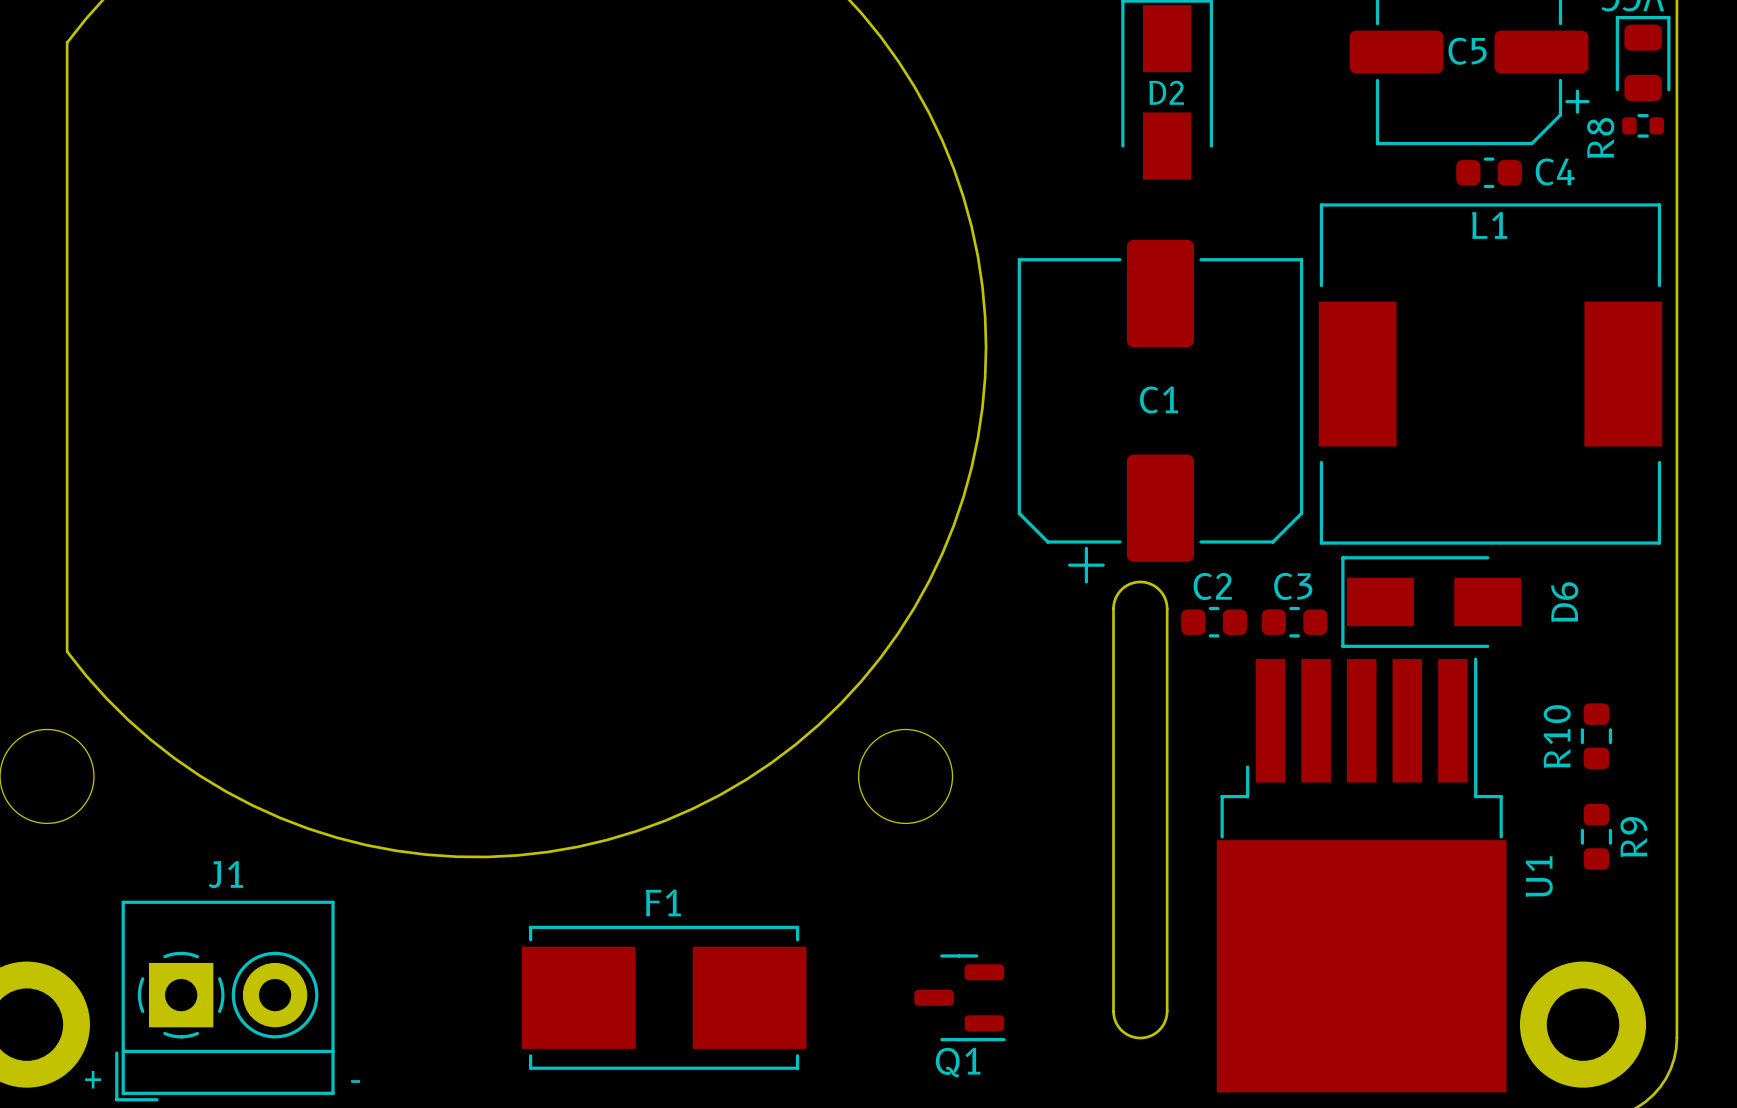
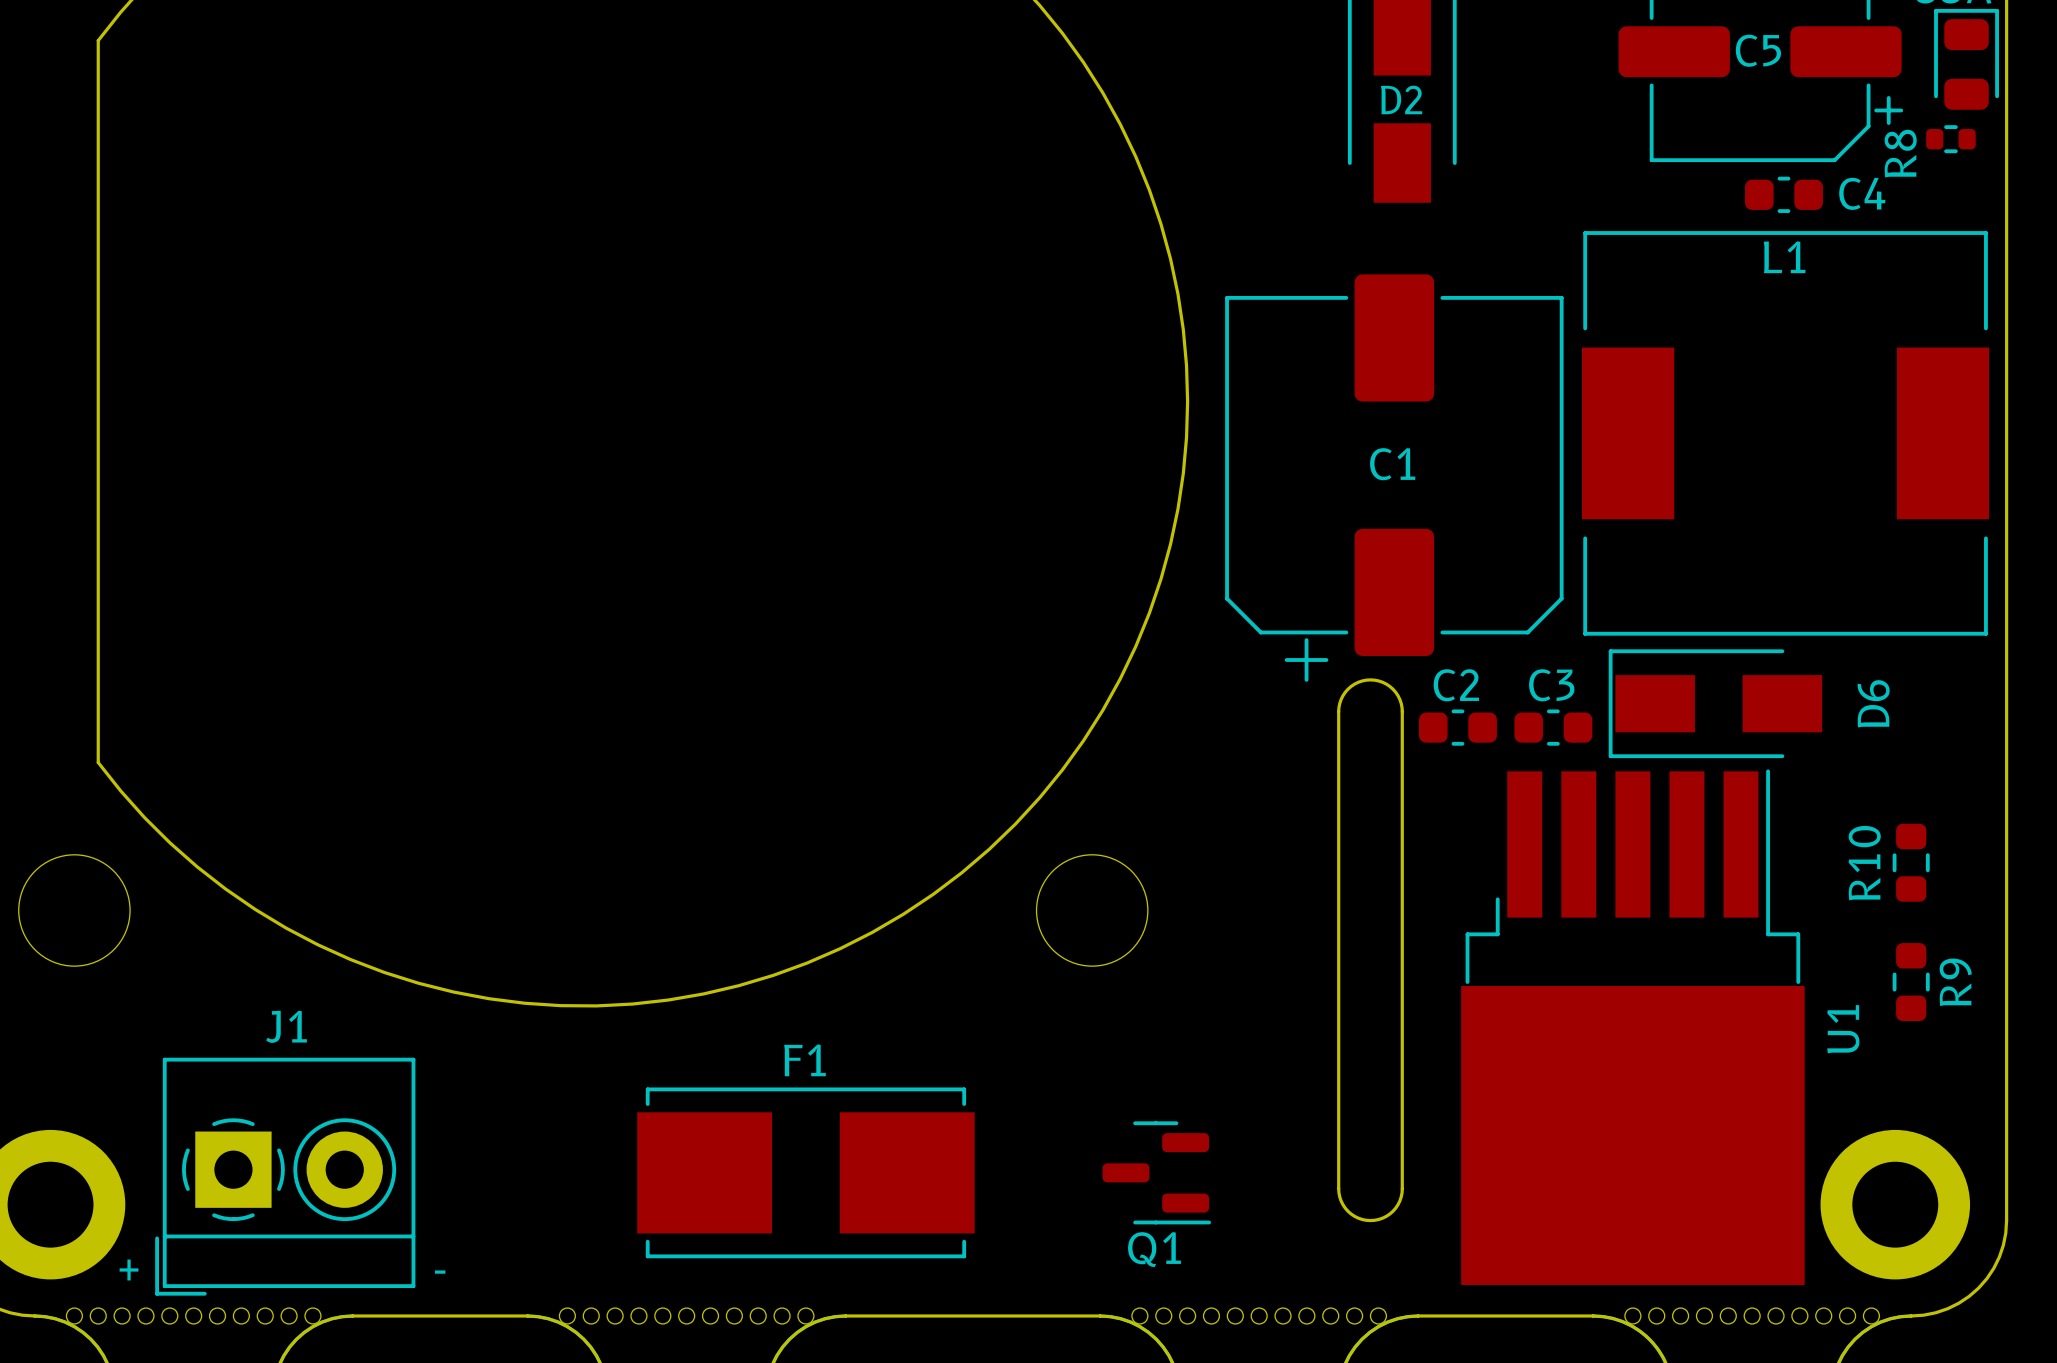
R8 position: (1643, 125) -> (1950, 139)

